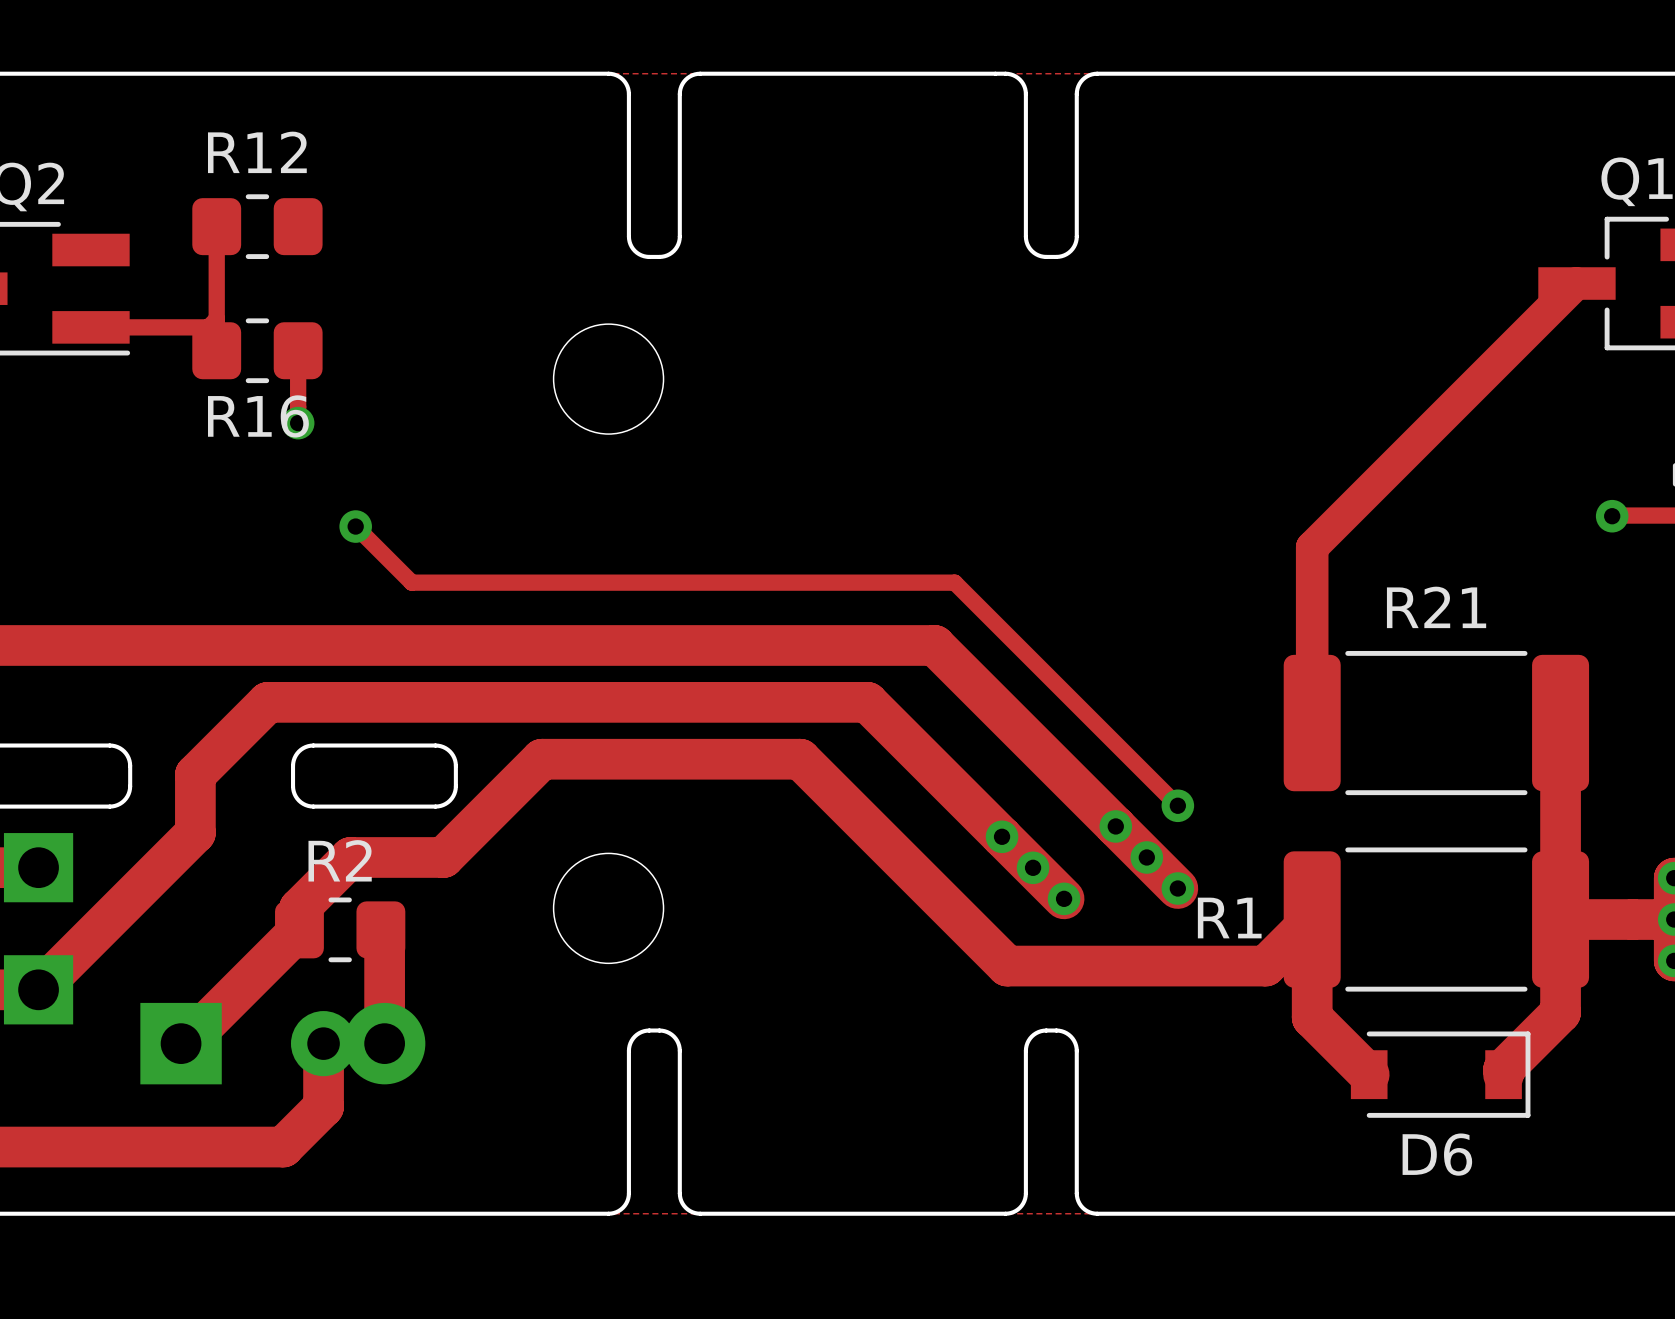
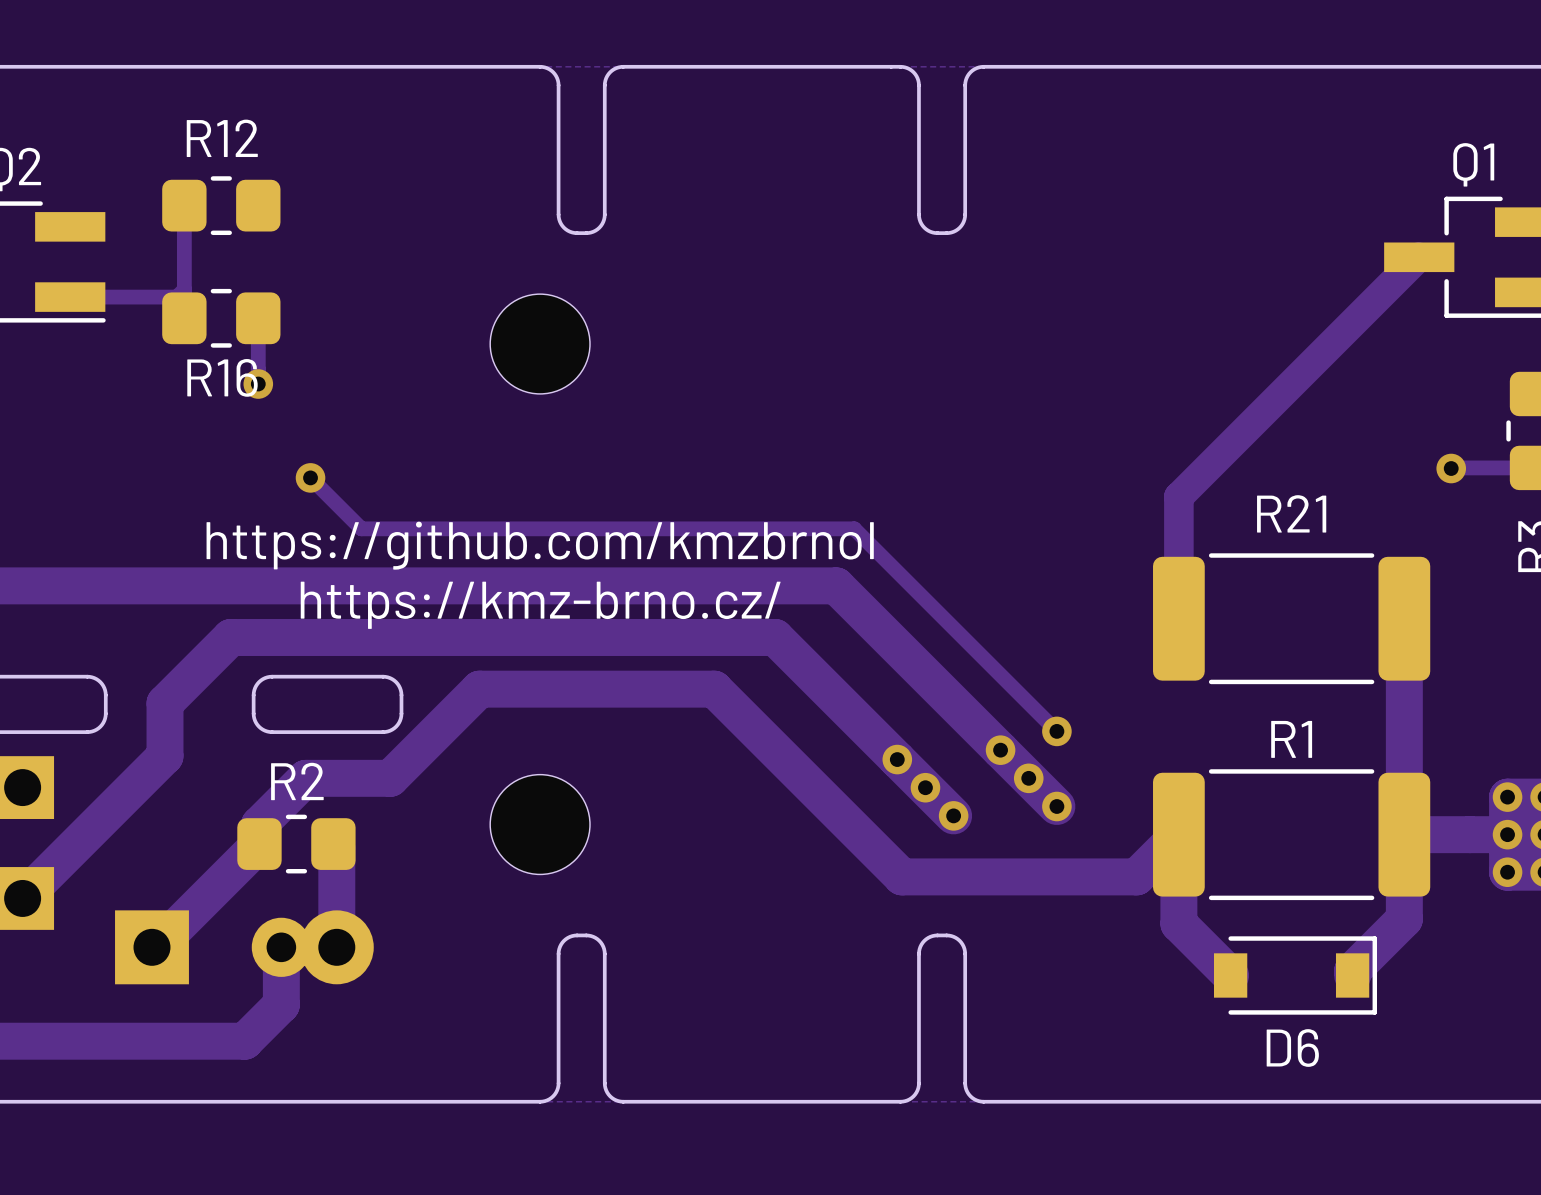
text: none -> https://github.com/kmzbrnoI (540, 545)
text: none -> https://kmz-brno.cz/ (540, 605)
R21 position: (1436, 723) -> (1291, 618)
R1 name position: R1 (1229, 918) -> R1 (1291, 739)

